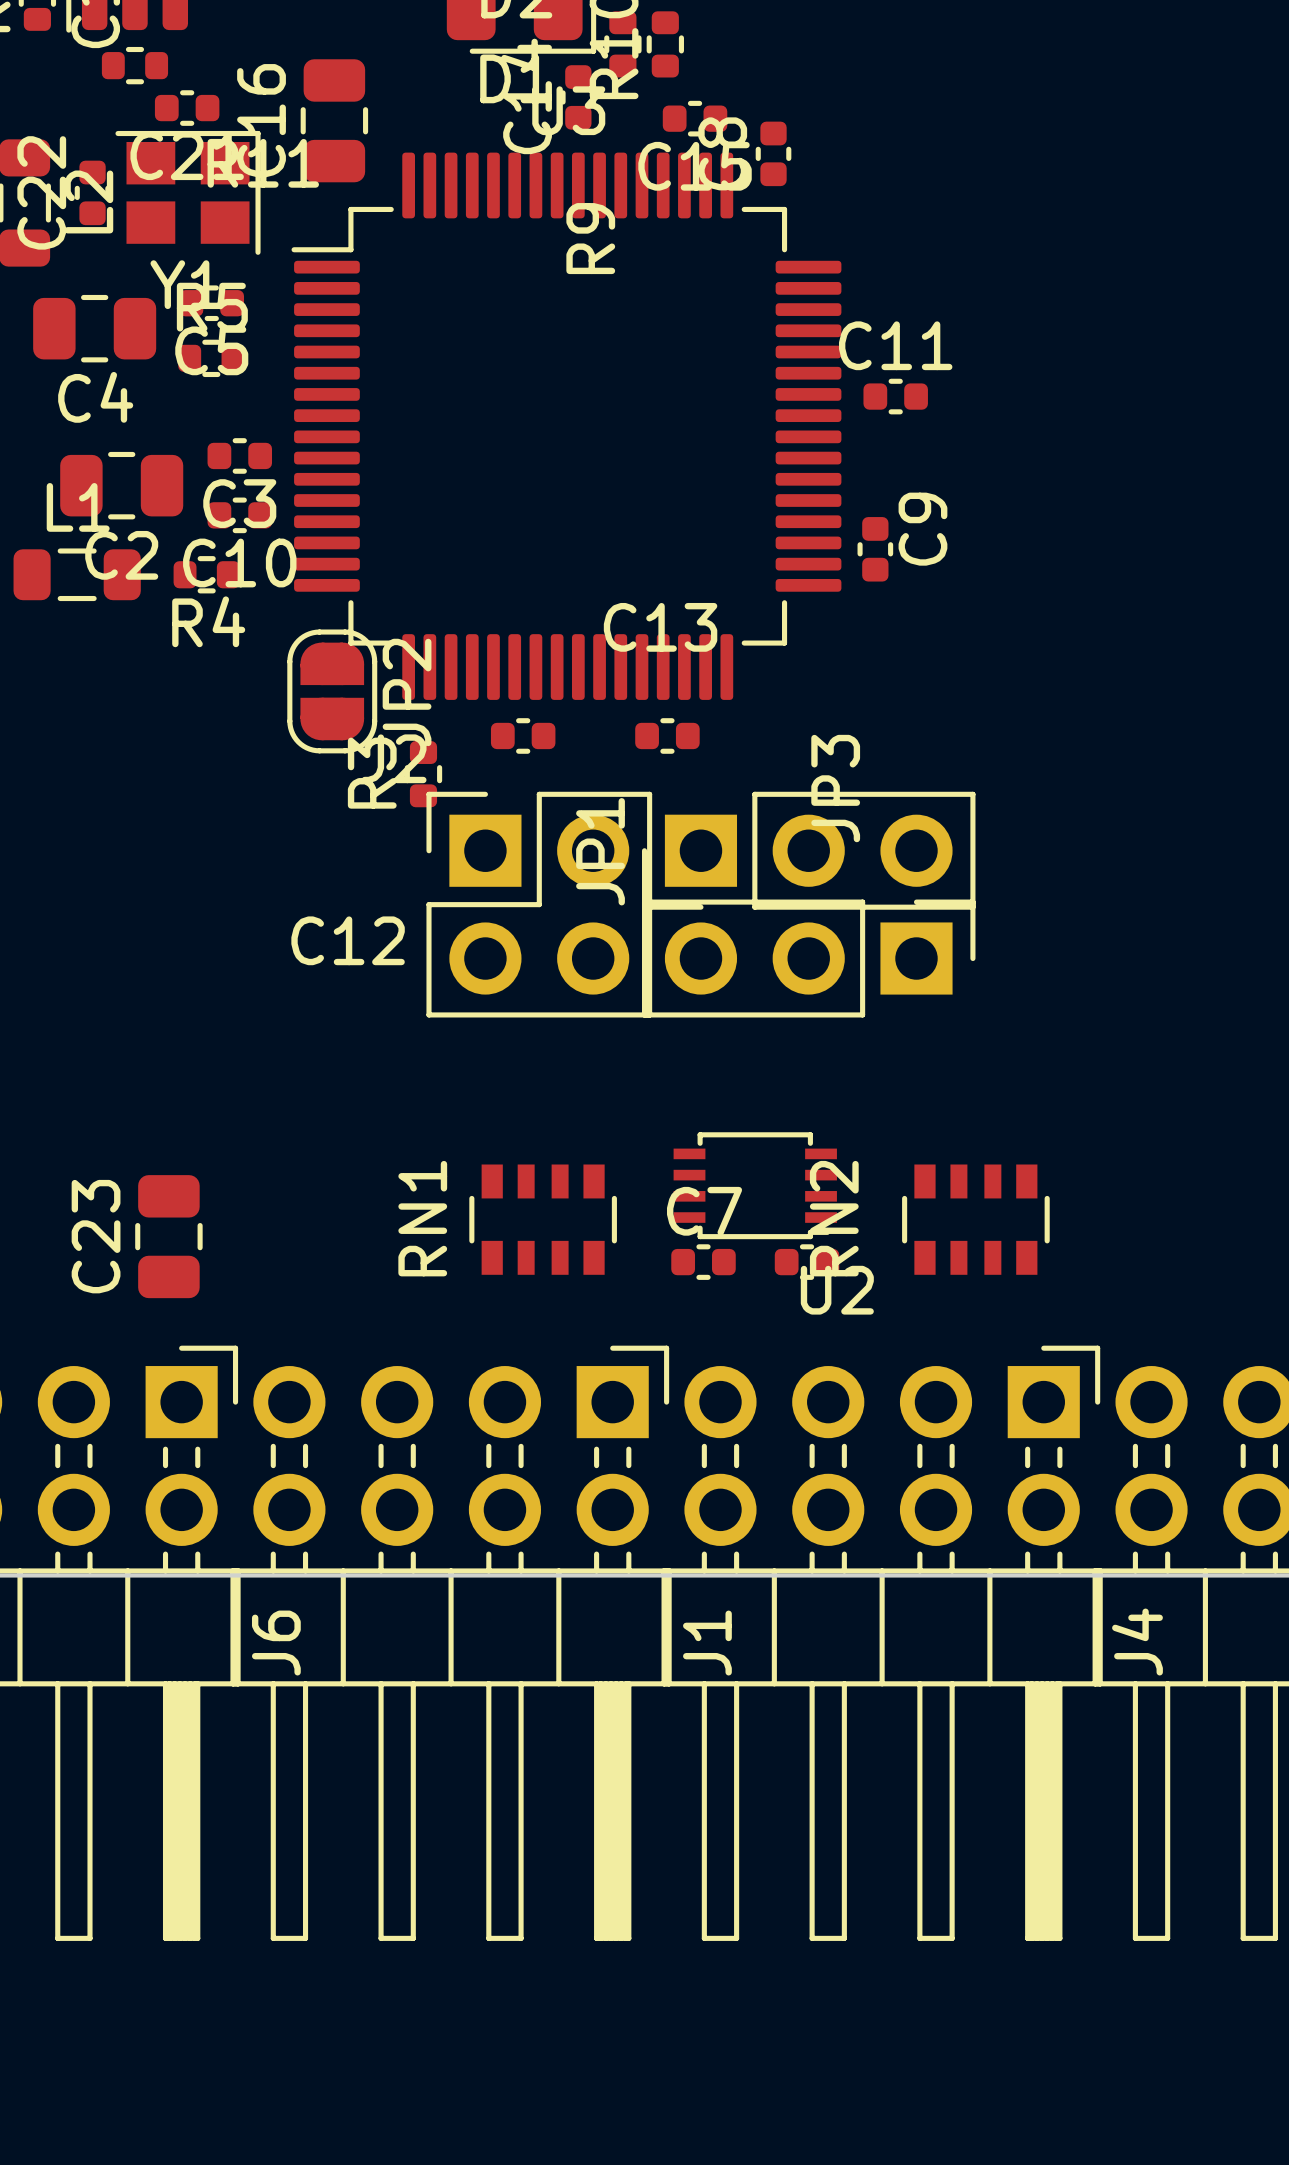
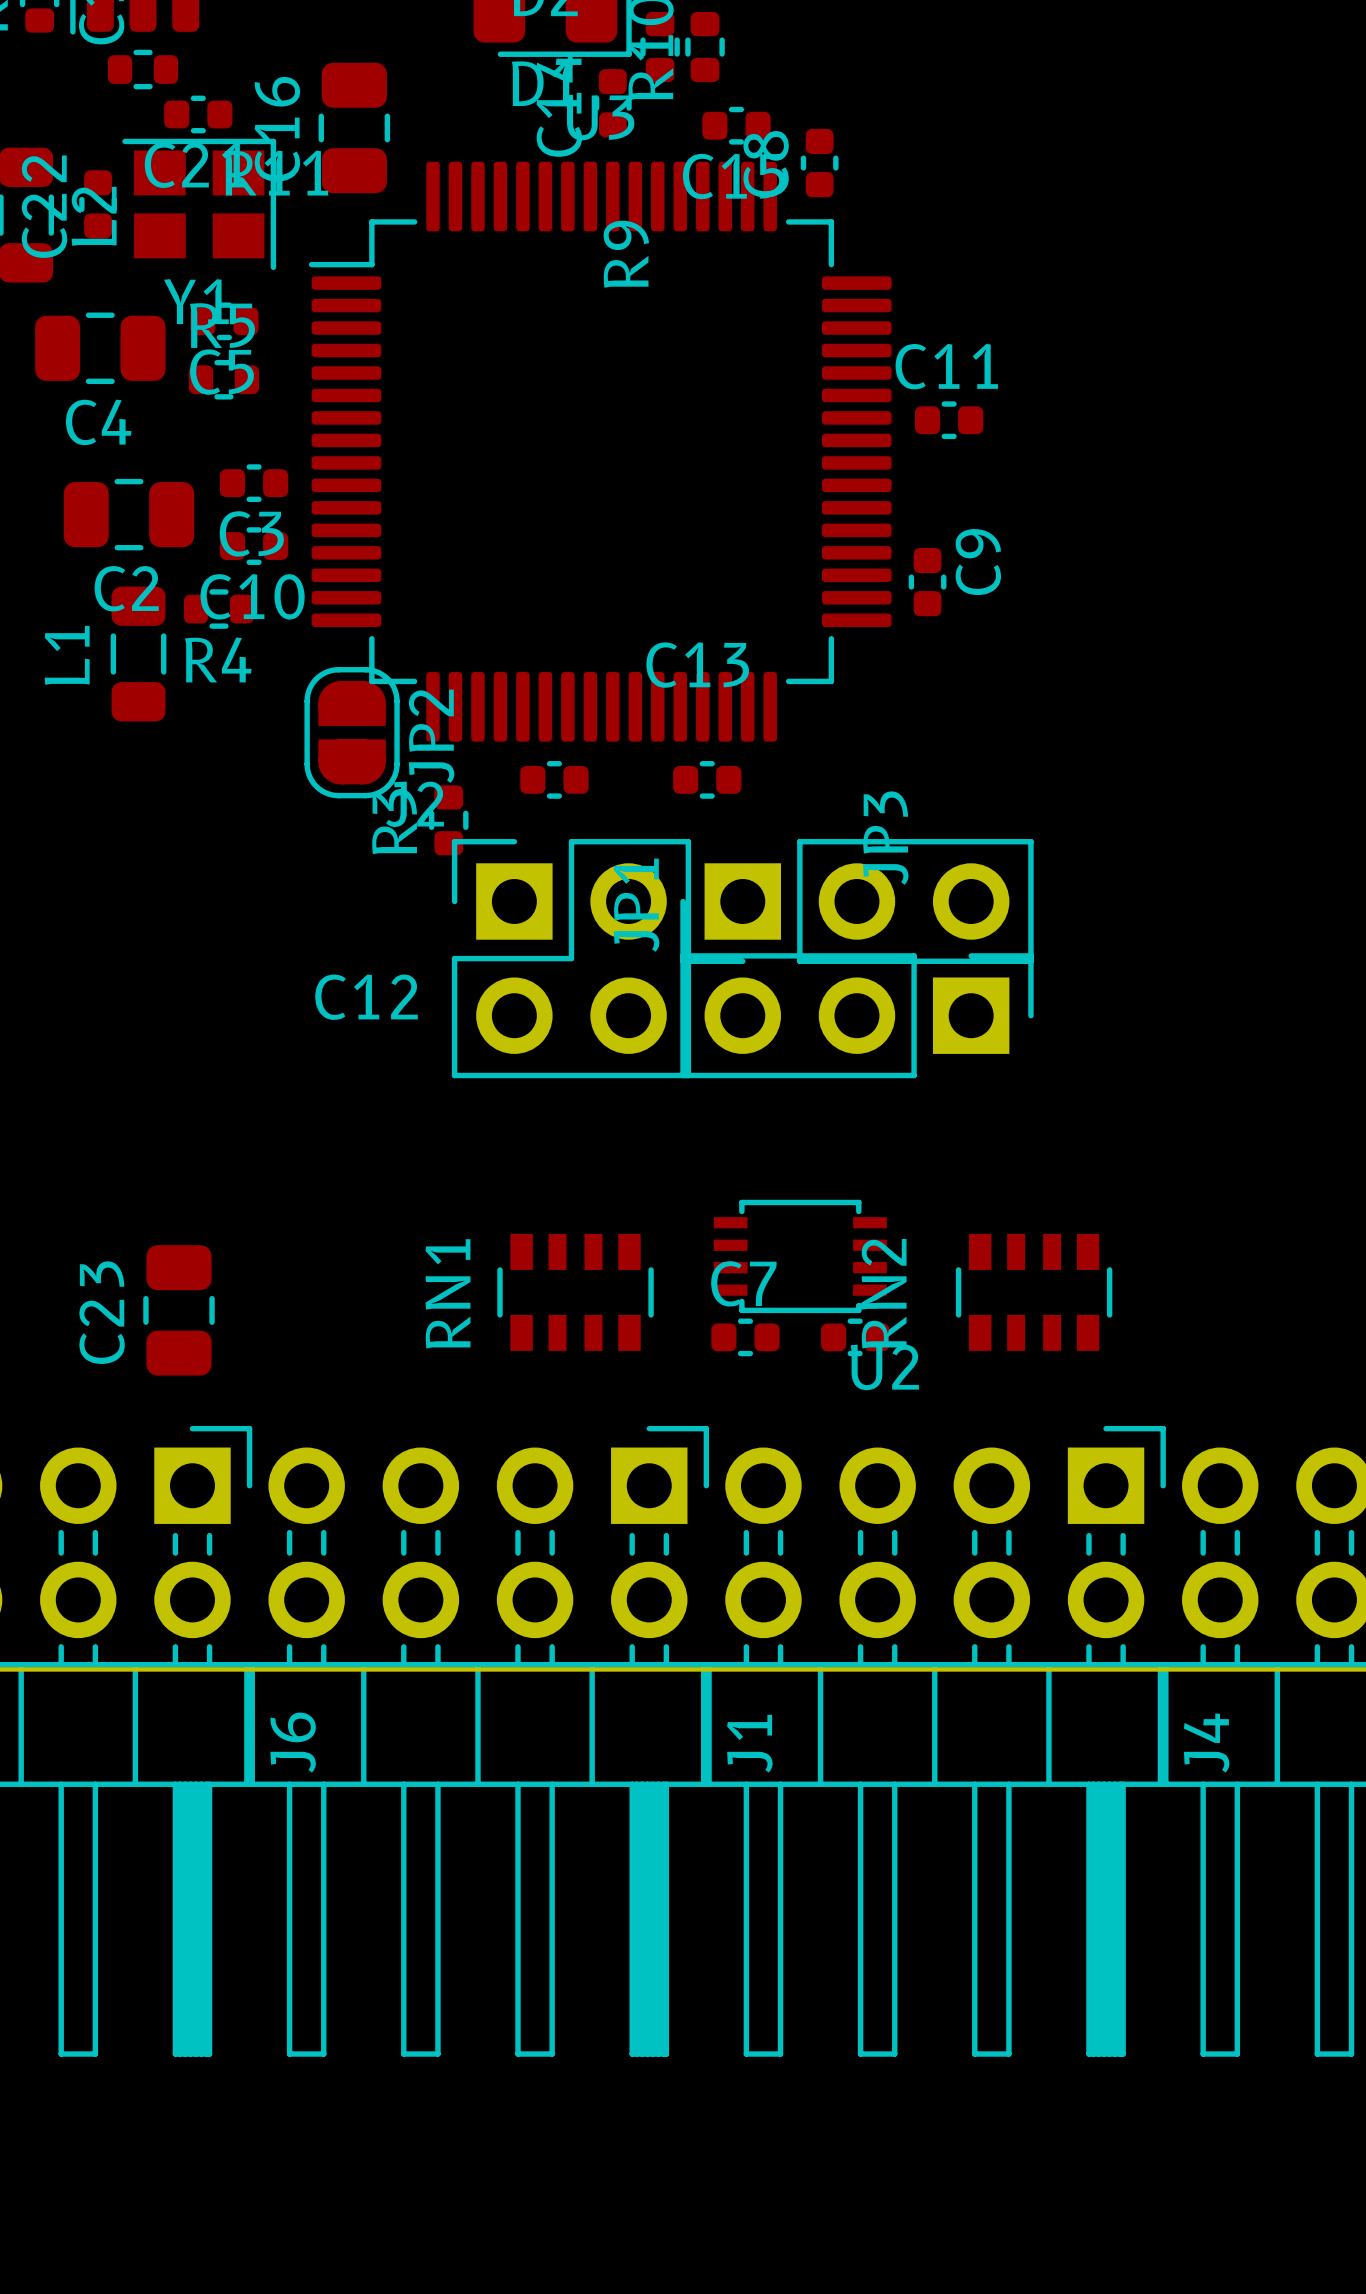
L1 name position: L1 (78, 507) -> L1 (67, 655)
L1 rotation: 0° (77, 574) -> 90° clockwise (138, 654)

